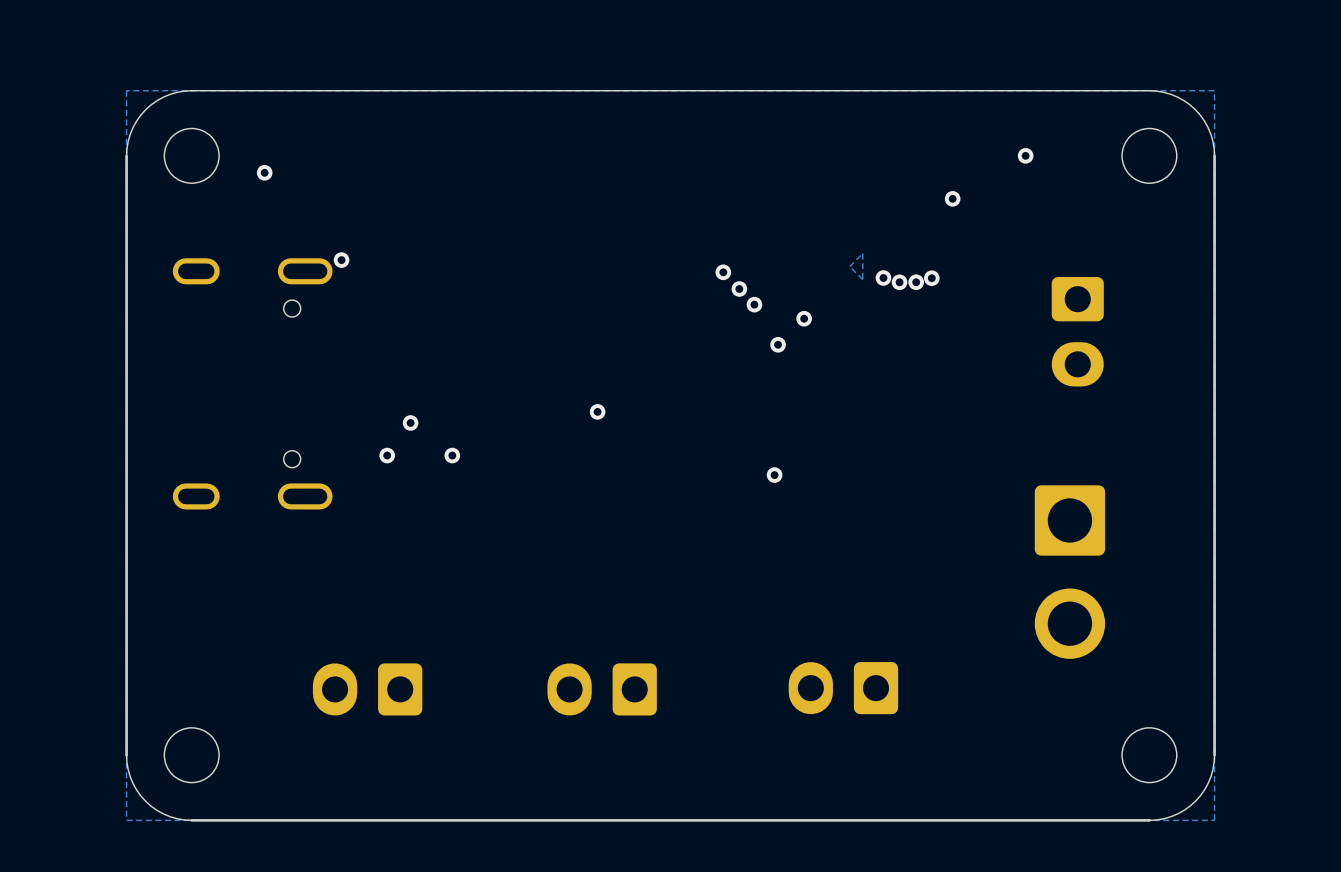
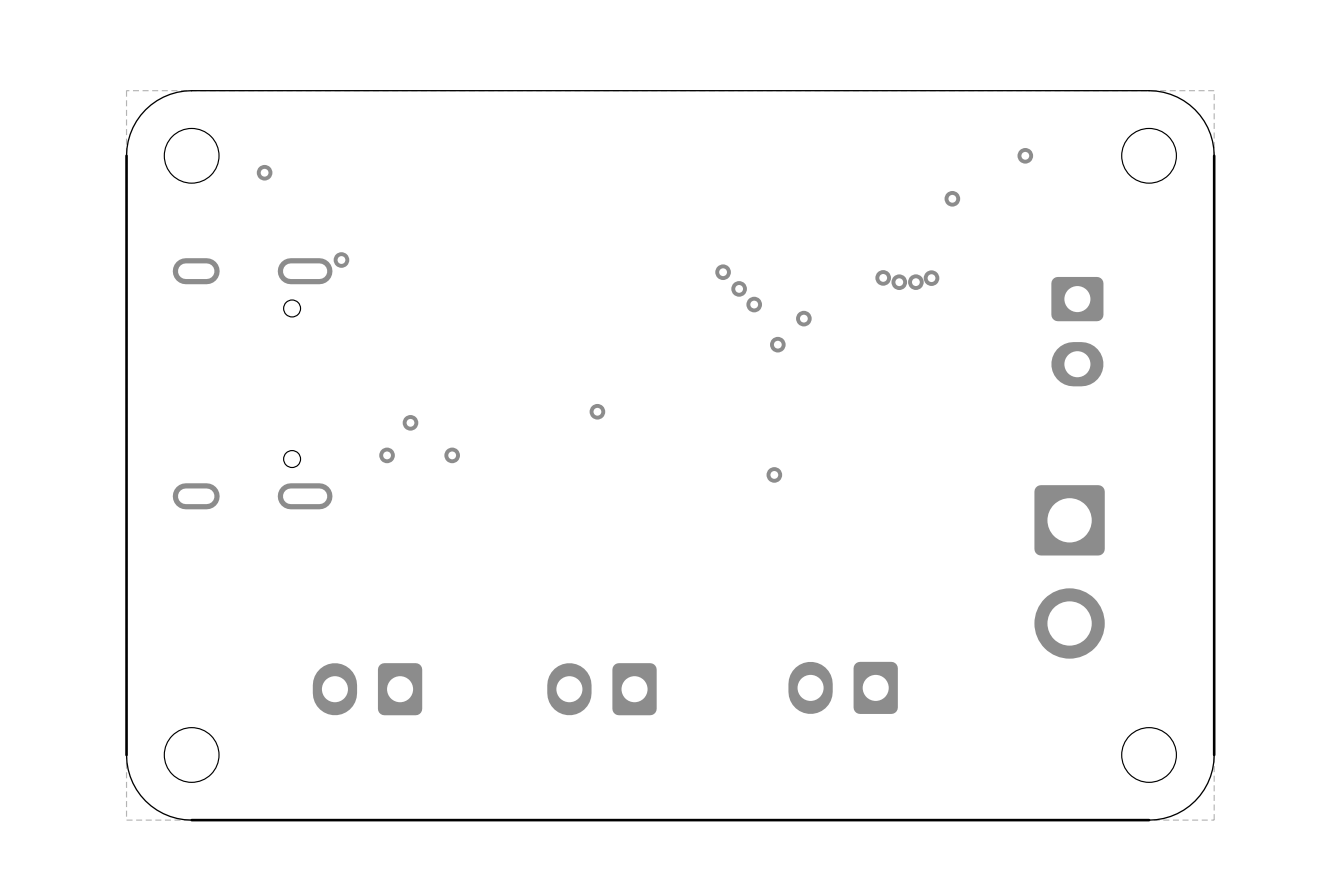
zone outline: (862, 253) (862, 279) (849, 266) (862, 253) -> none

